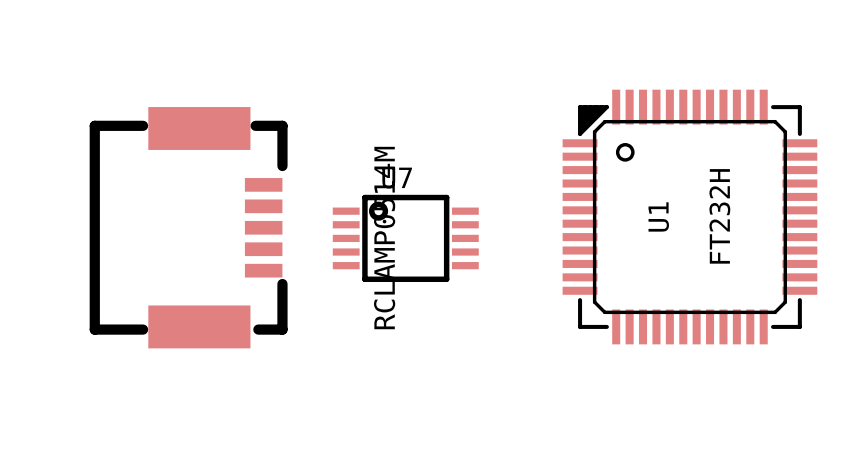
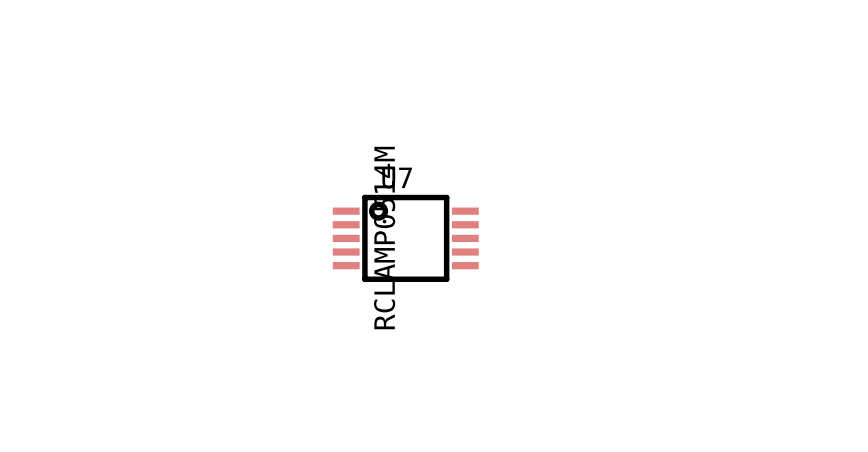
U1: FT232H (689, 217) -> none
part: (188, 227) -> none

